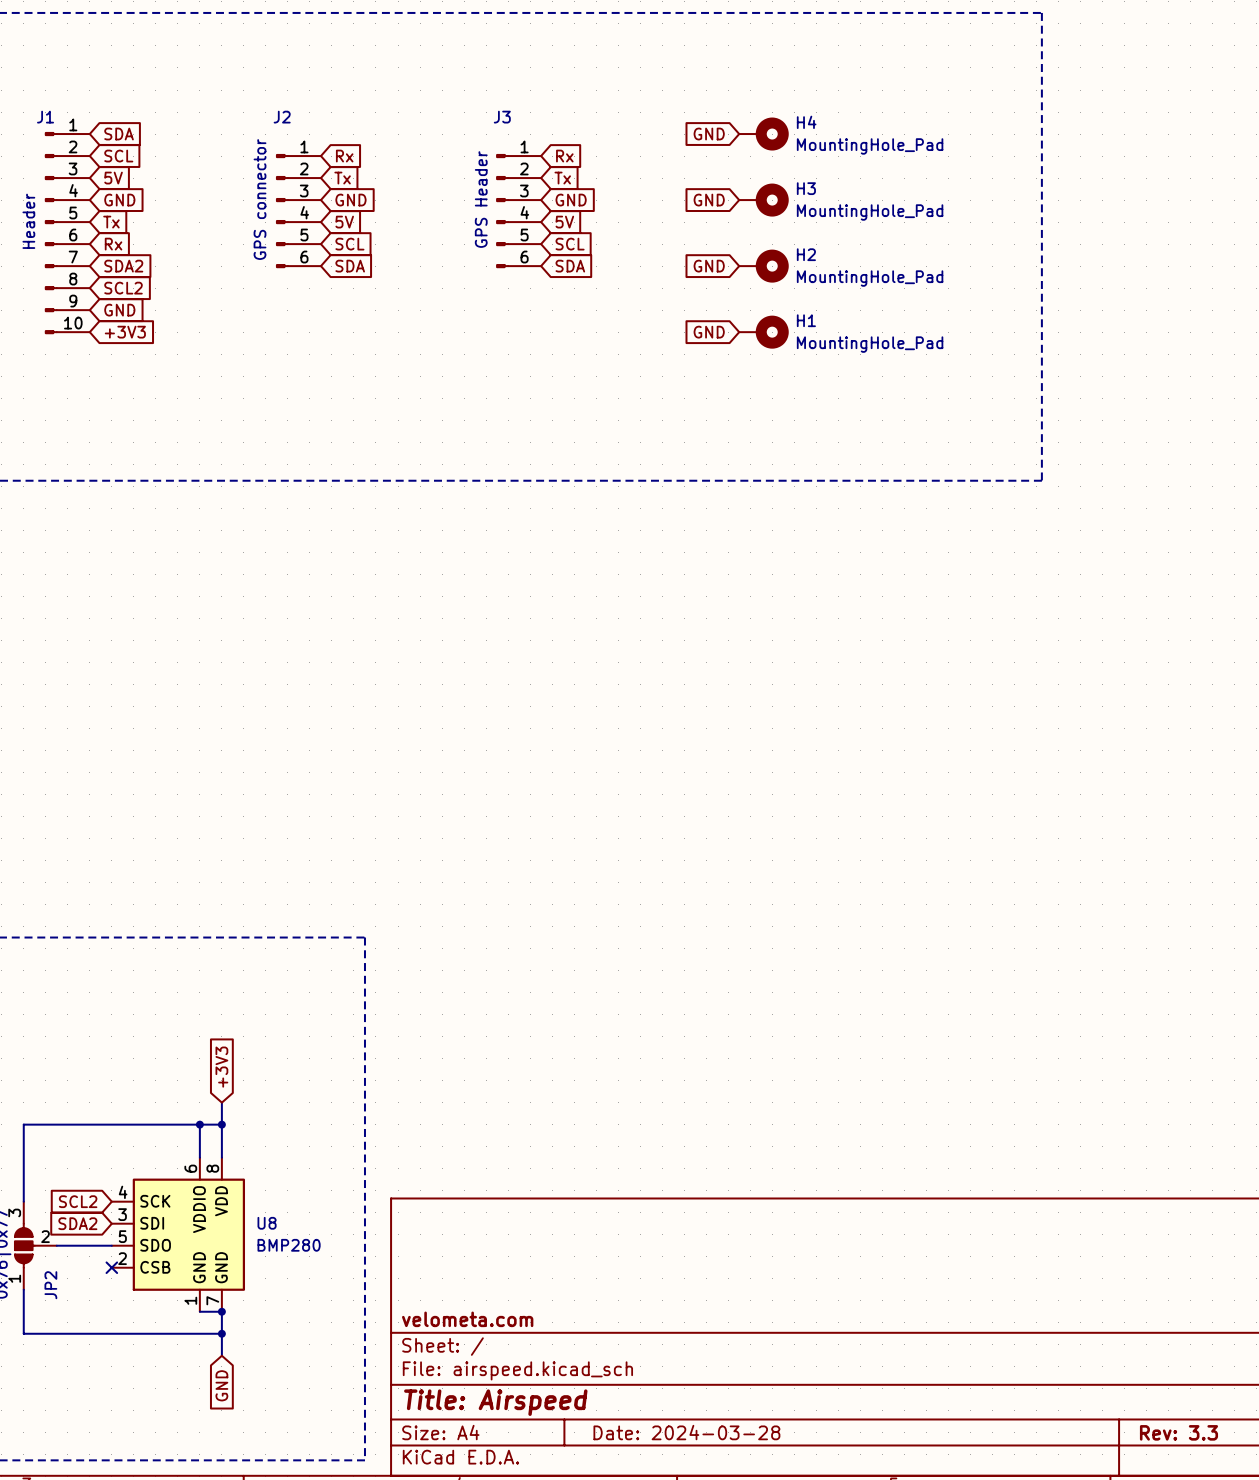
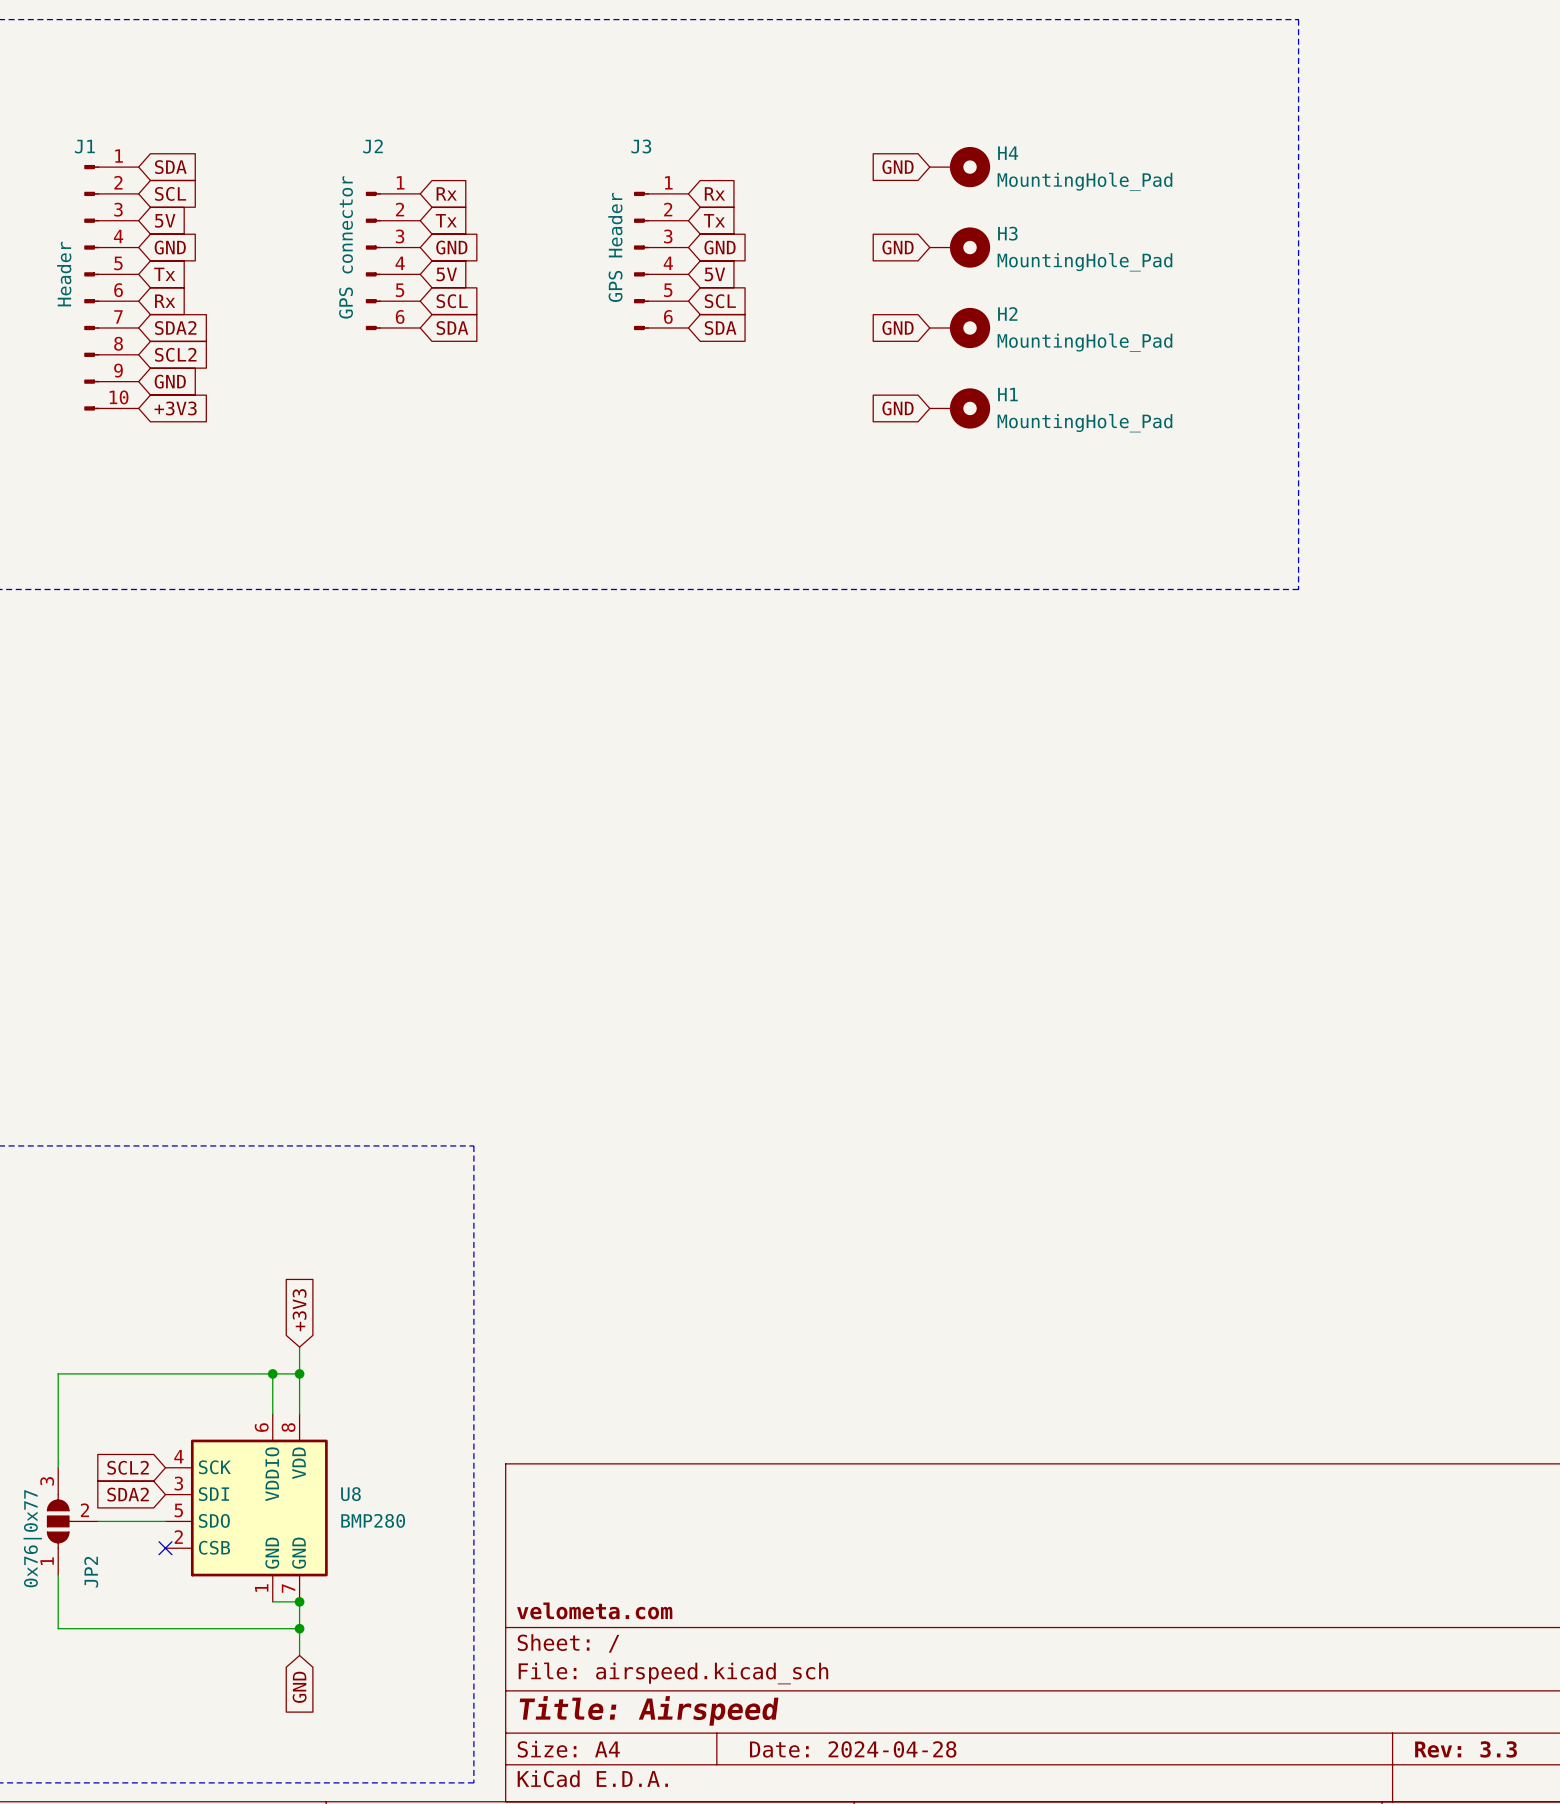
title block: Date: 2024-03-28 (686, 1432) -> Date: 2024-04-28 (853, 1749)

